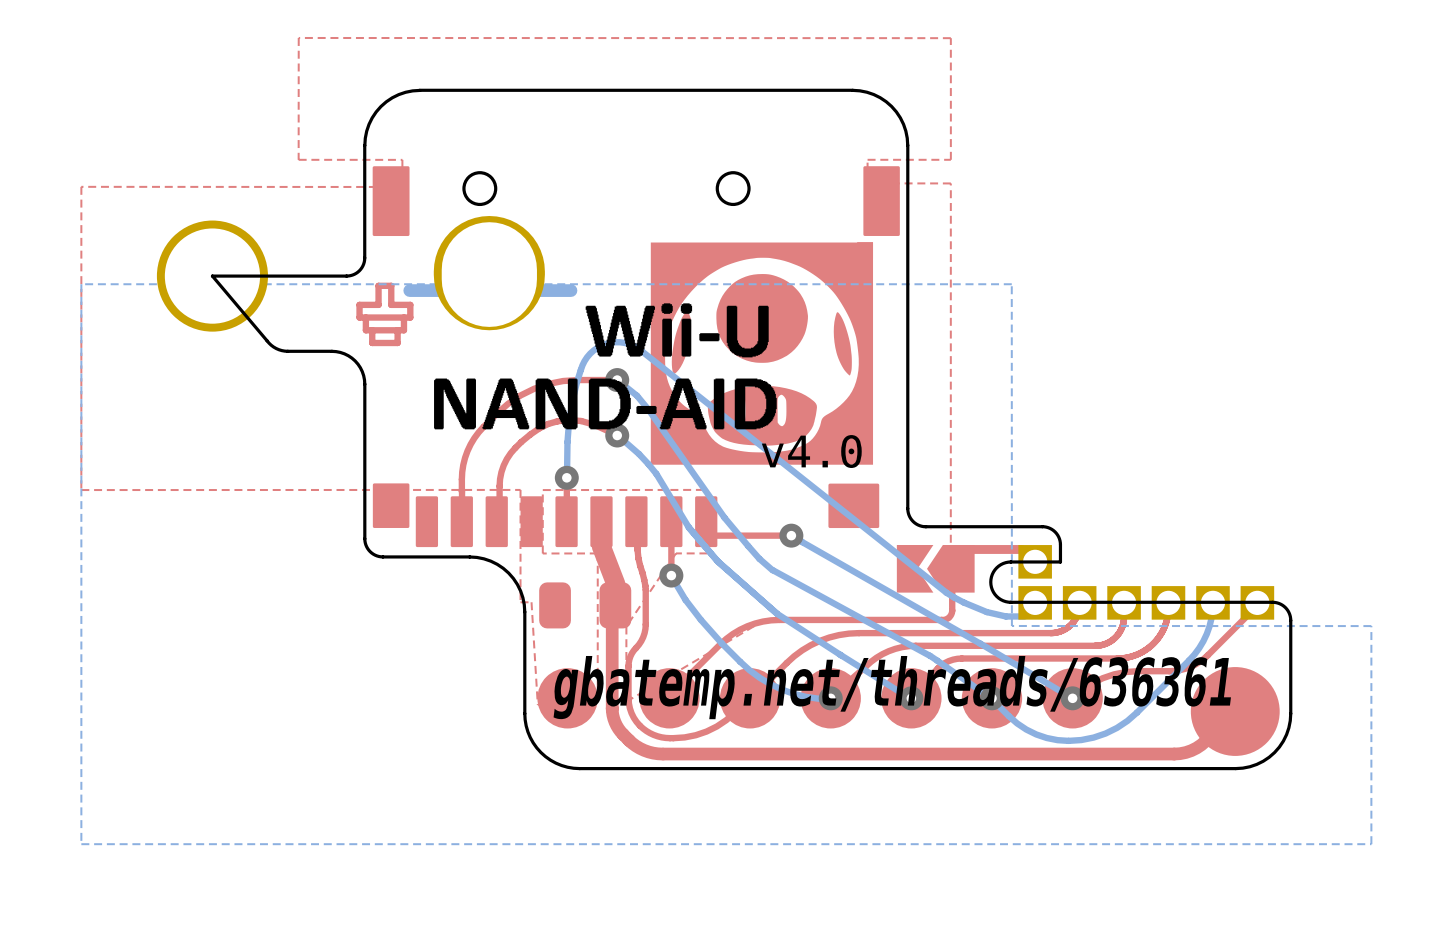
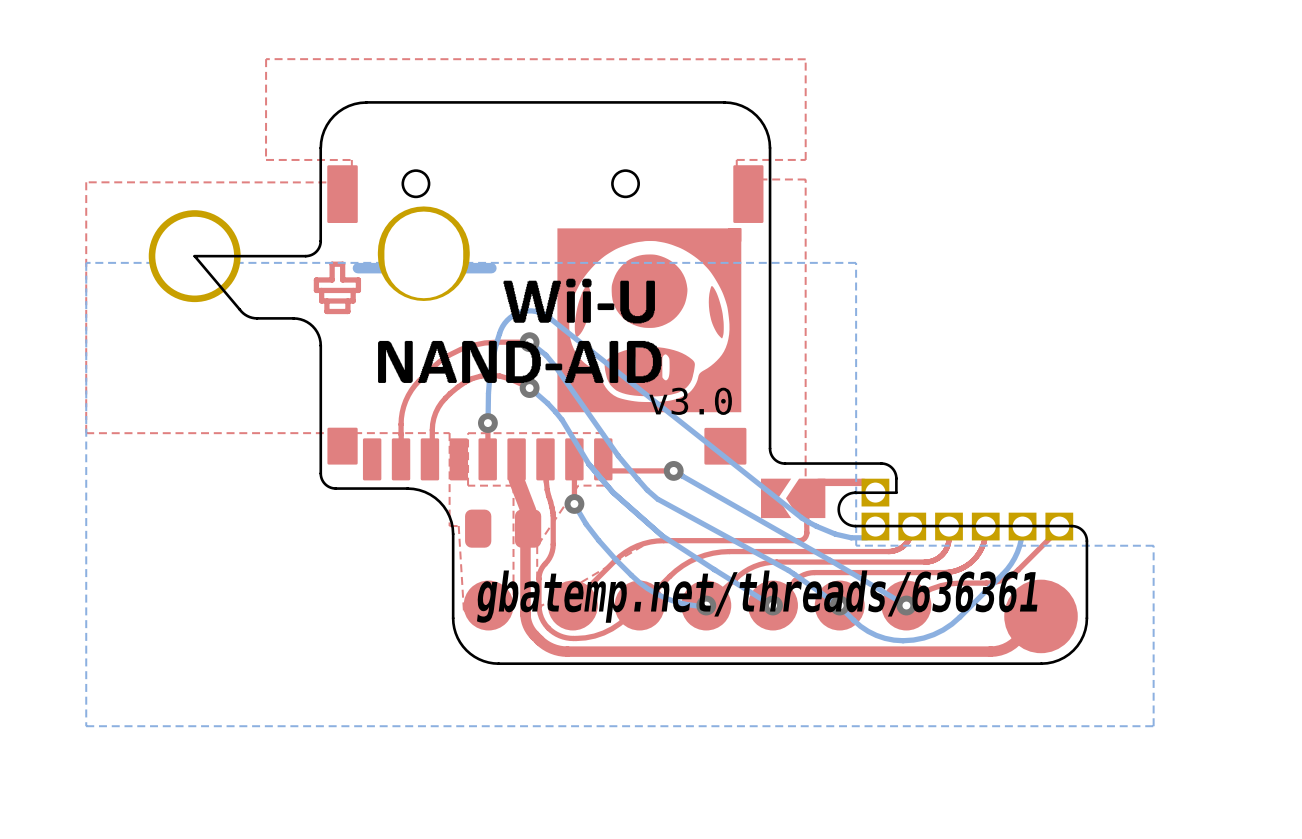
text: v4.0 (811, 451) -> v3.0 (690, 401)

